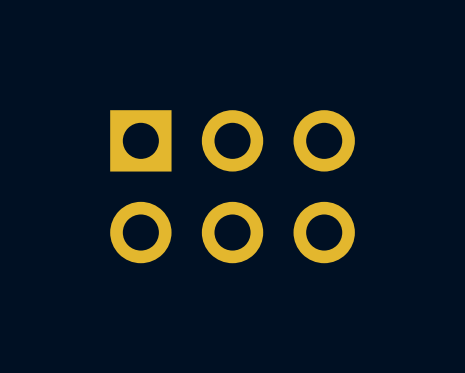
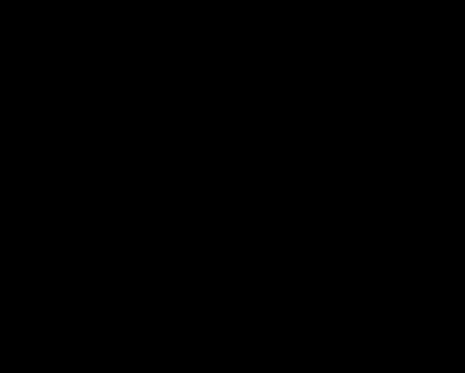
part: (232, 186) -> none

